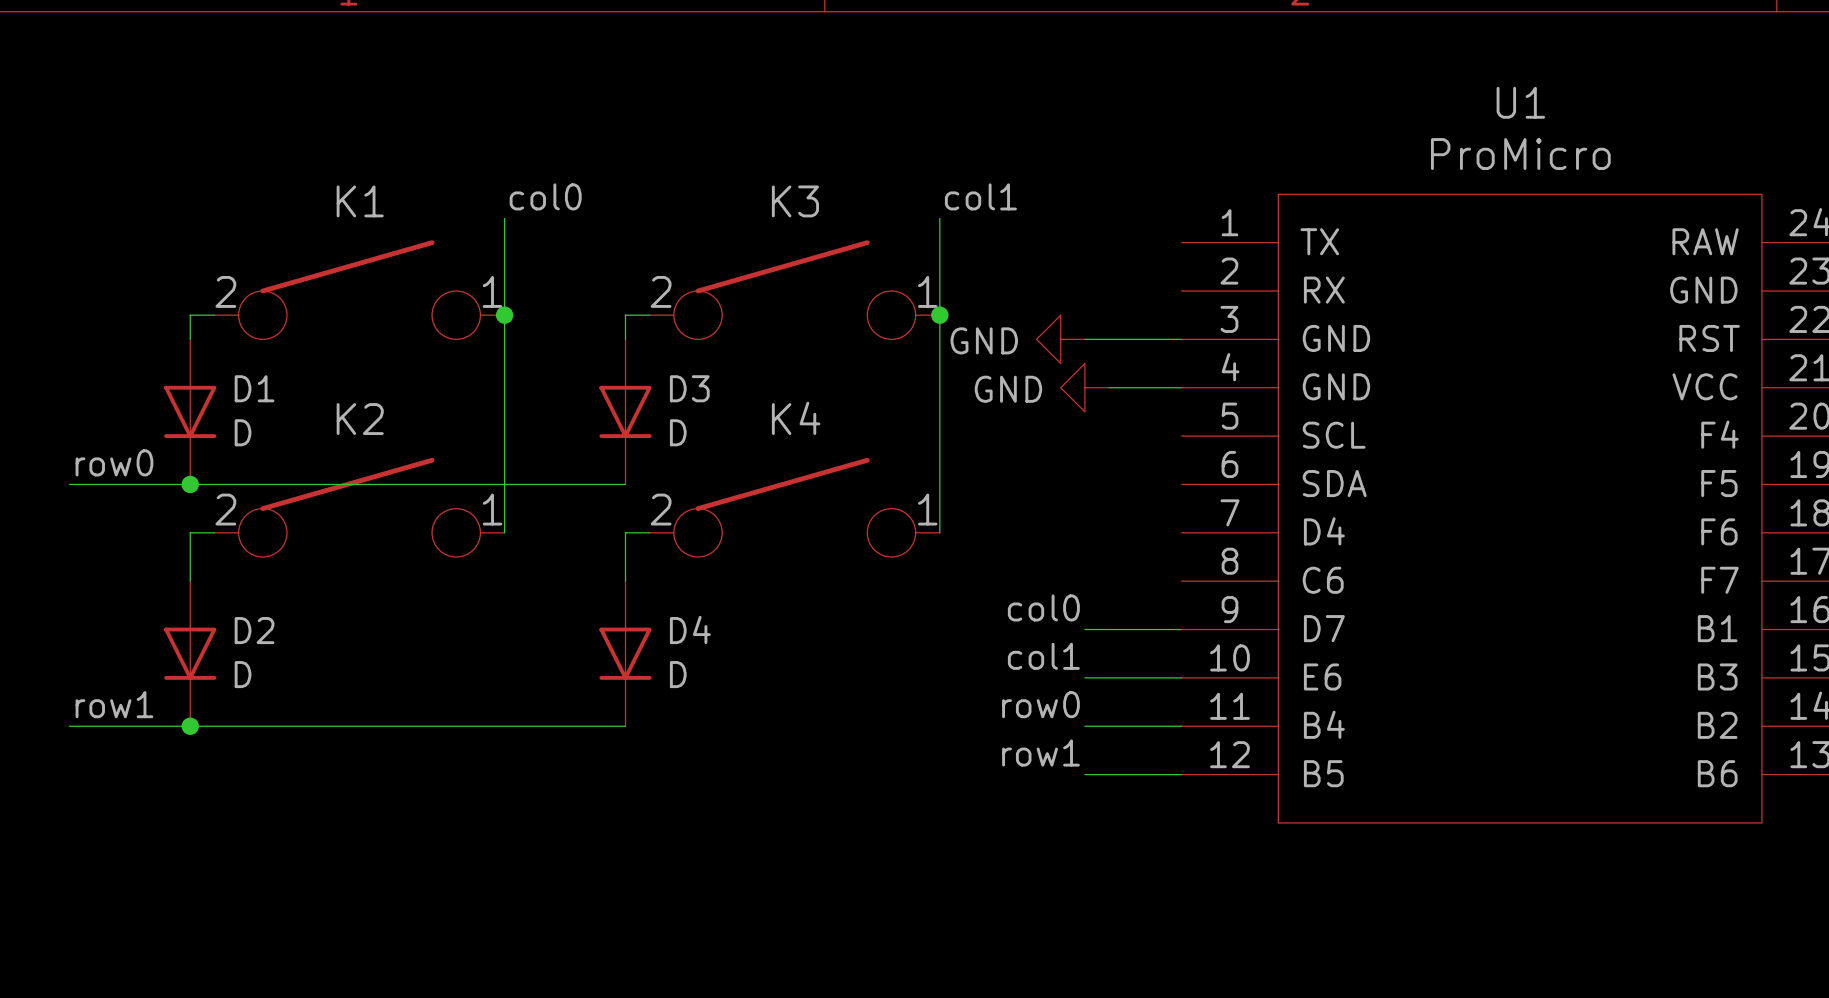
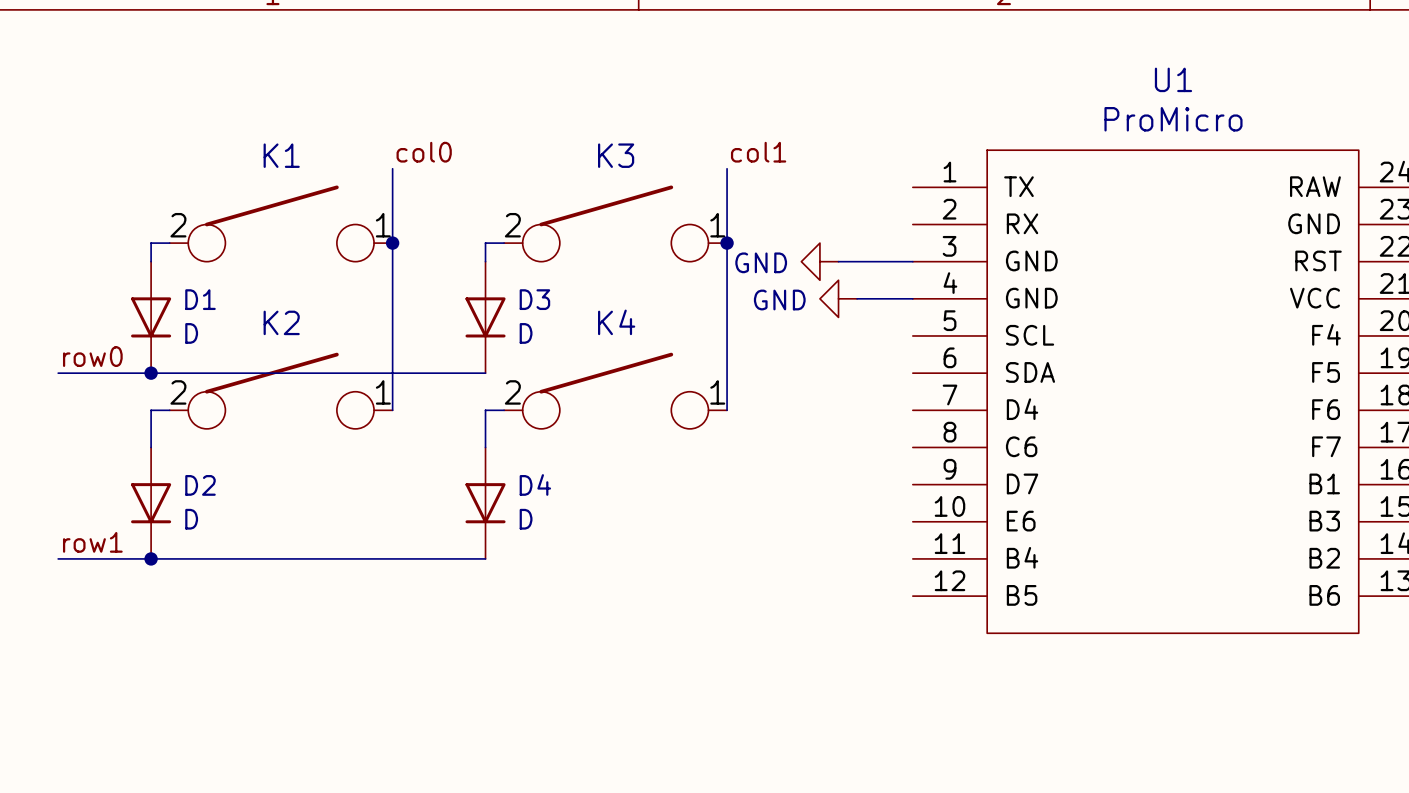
label: col0 (1043, 607) -> none
wire: (1084, 629) (1181, 629) -> none
label: col1 (1043, 656) -> none
wire: (1084, 677) (1181, 677) -> none
label: row0 (1040, 704) -> none
wire: (1084, 726) (1181, 726) -> none
label: row1 (1040, 753) -> none
wire: (1084, 774) (1181, 774) -> none

